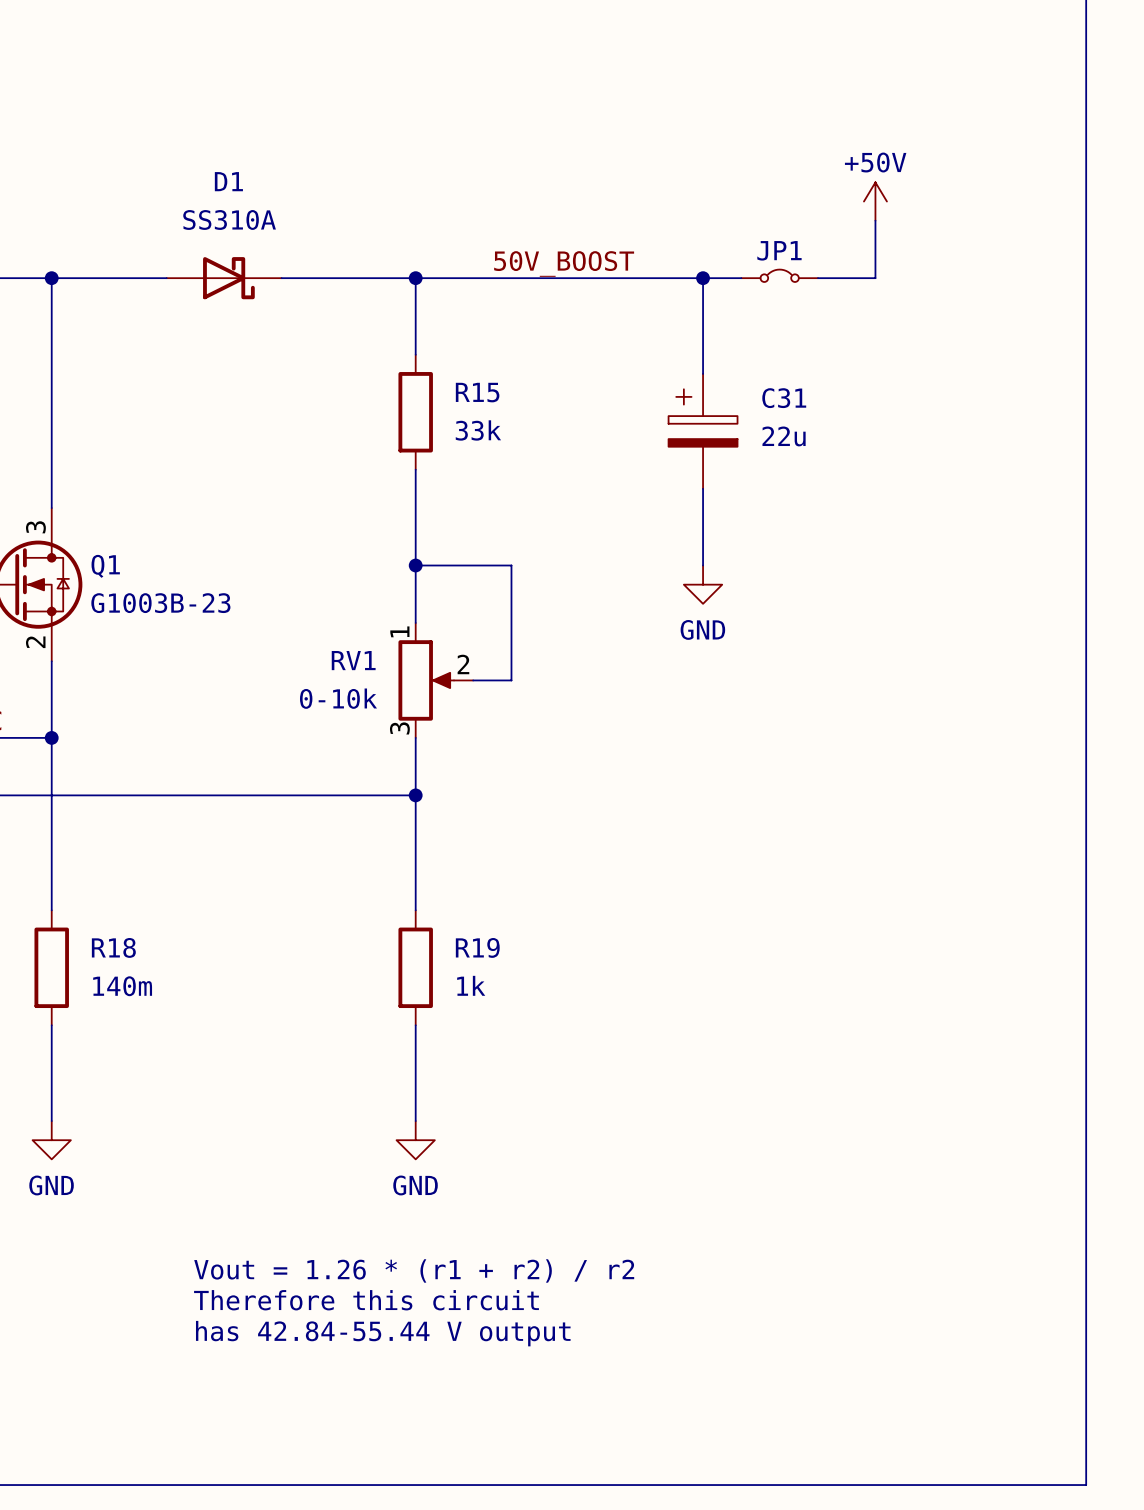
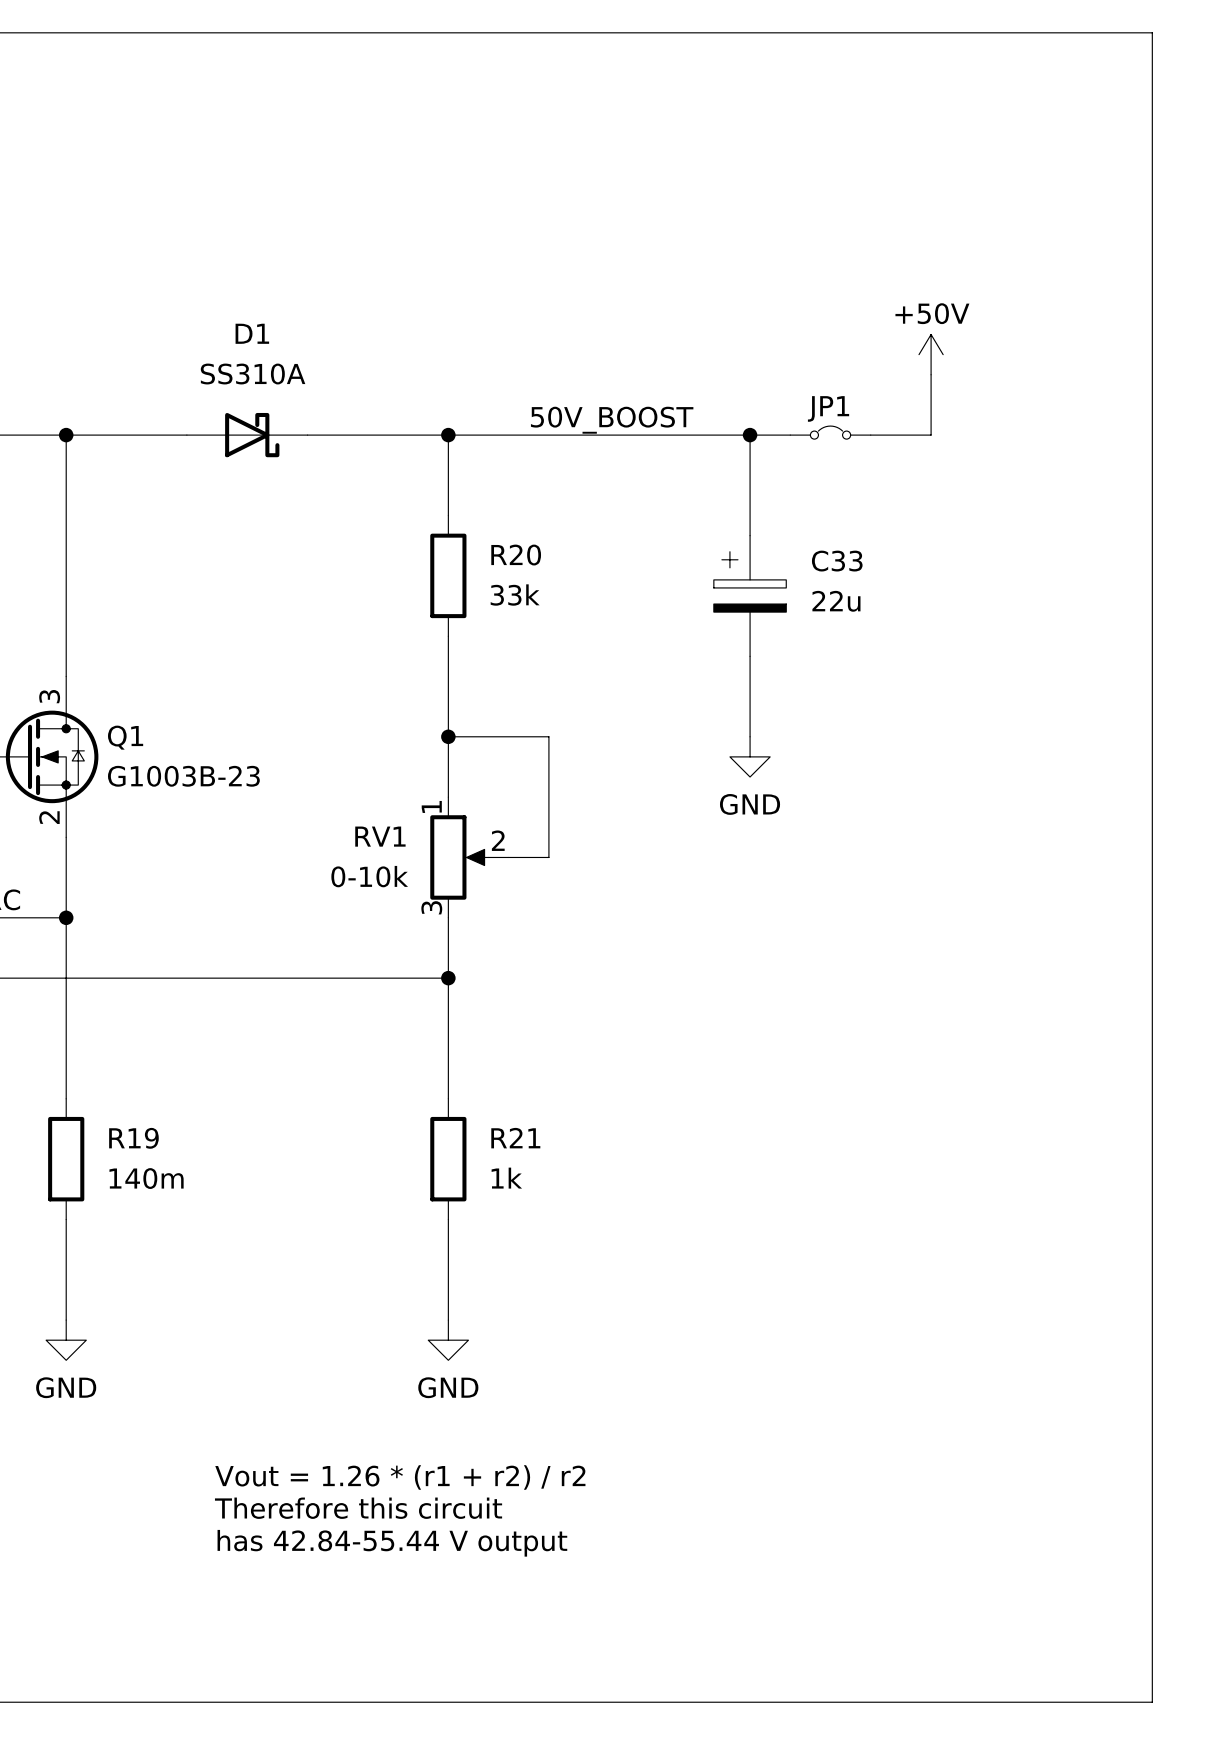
R15 name: R15 (477, 392) -> R20 (516, 555)
C31 name: C31 (784, 398) -> C33 (837, 561)
R18 name: R18 (113, 947) -> R19 (133, 1138)
R19 name: R19 (477, 947) -> R21 (515, 1138)

